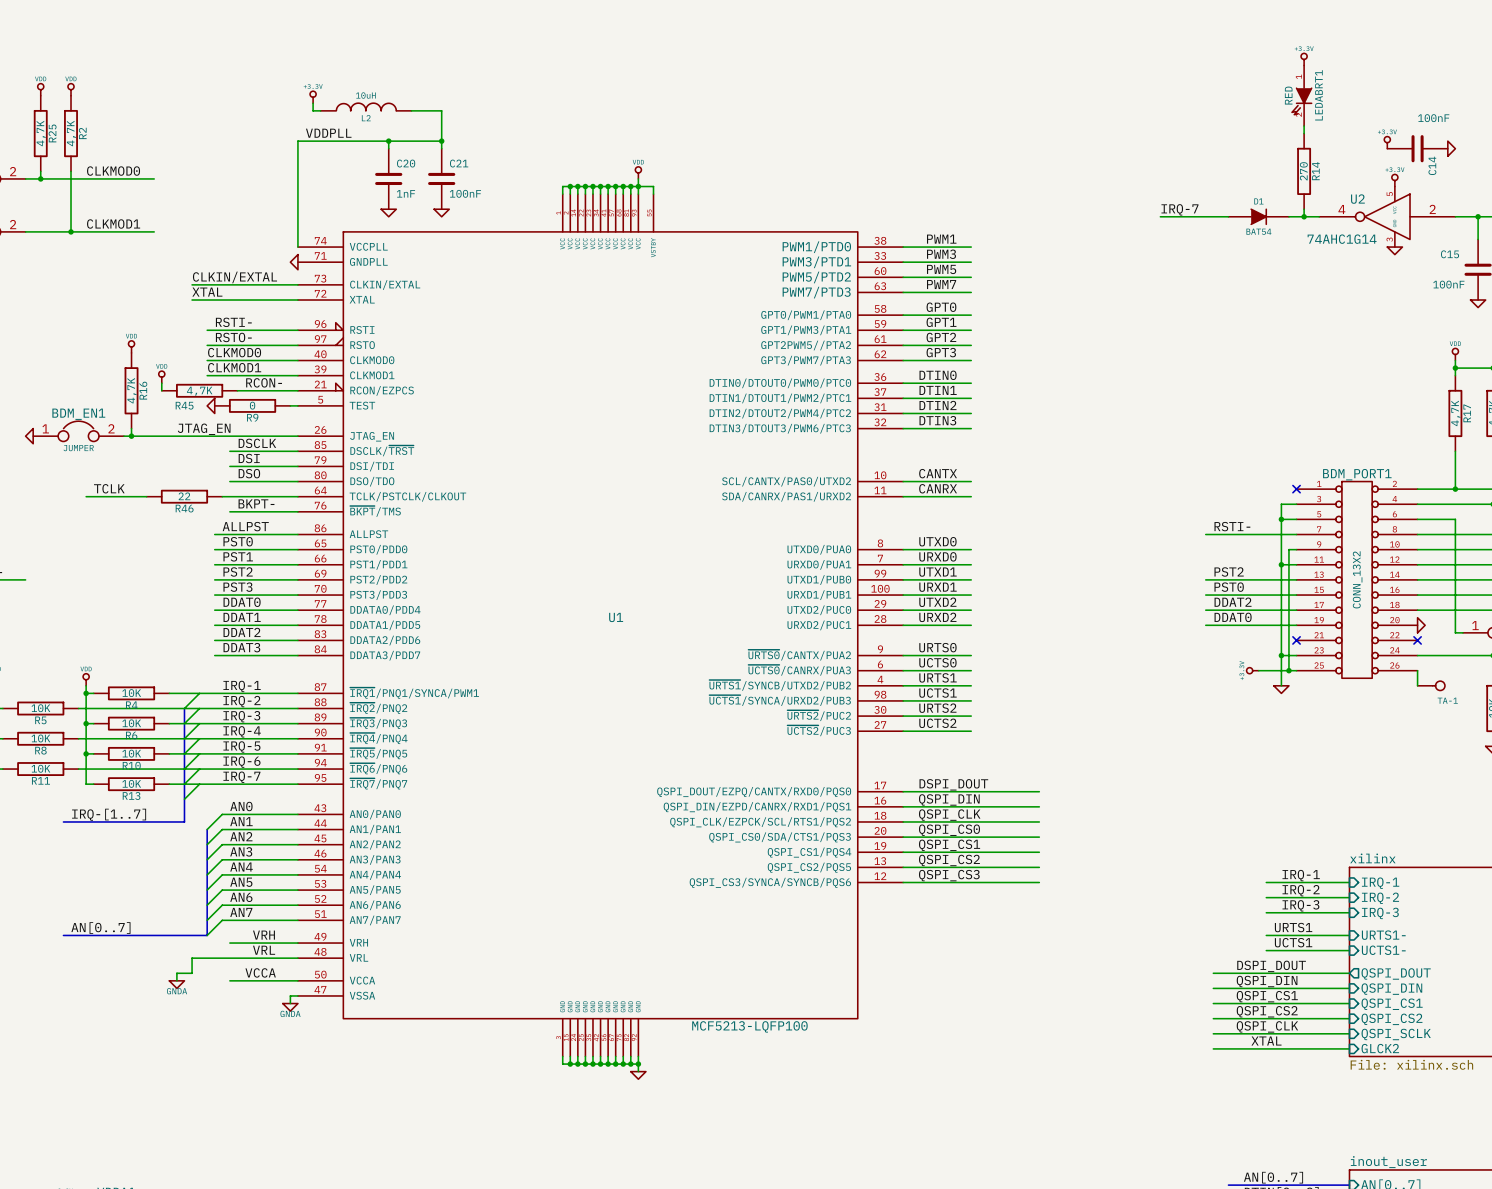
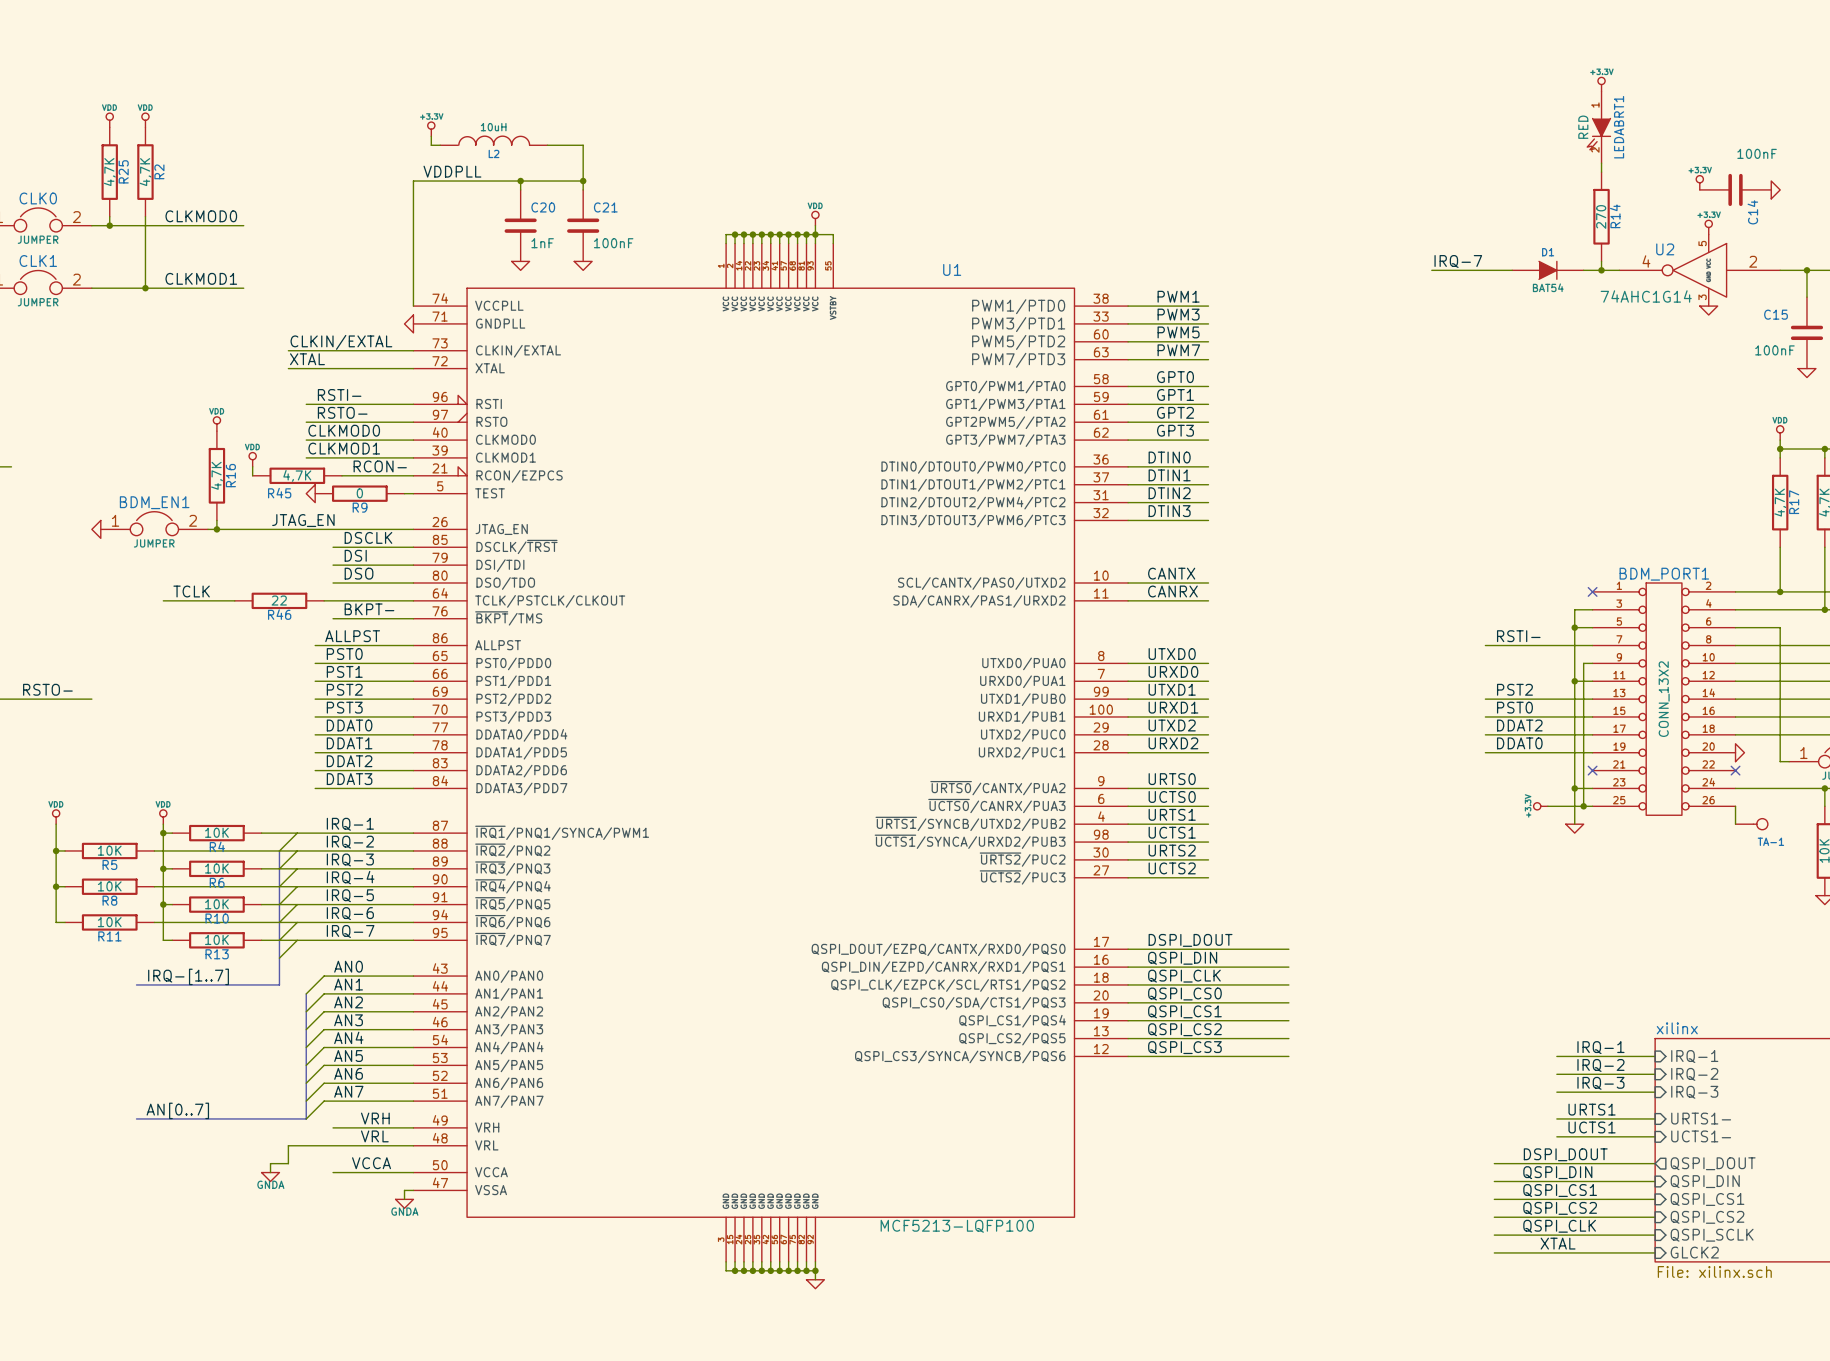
U1 name position: U1 (616, 617) -> U1 (952, 269)

